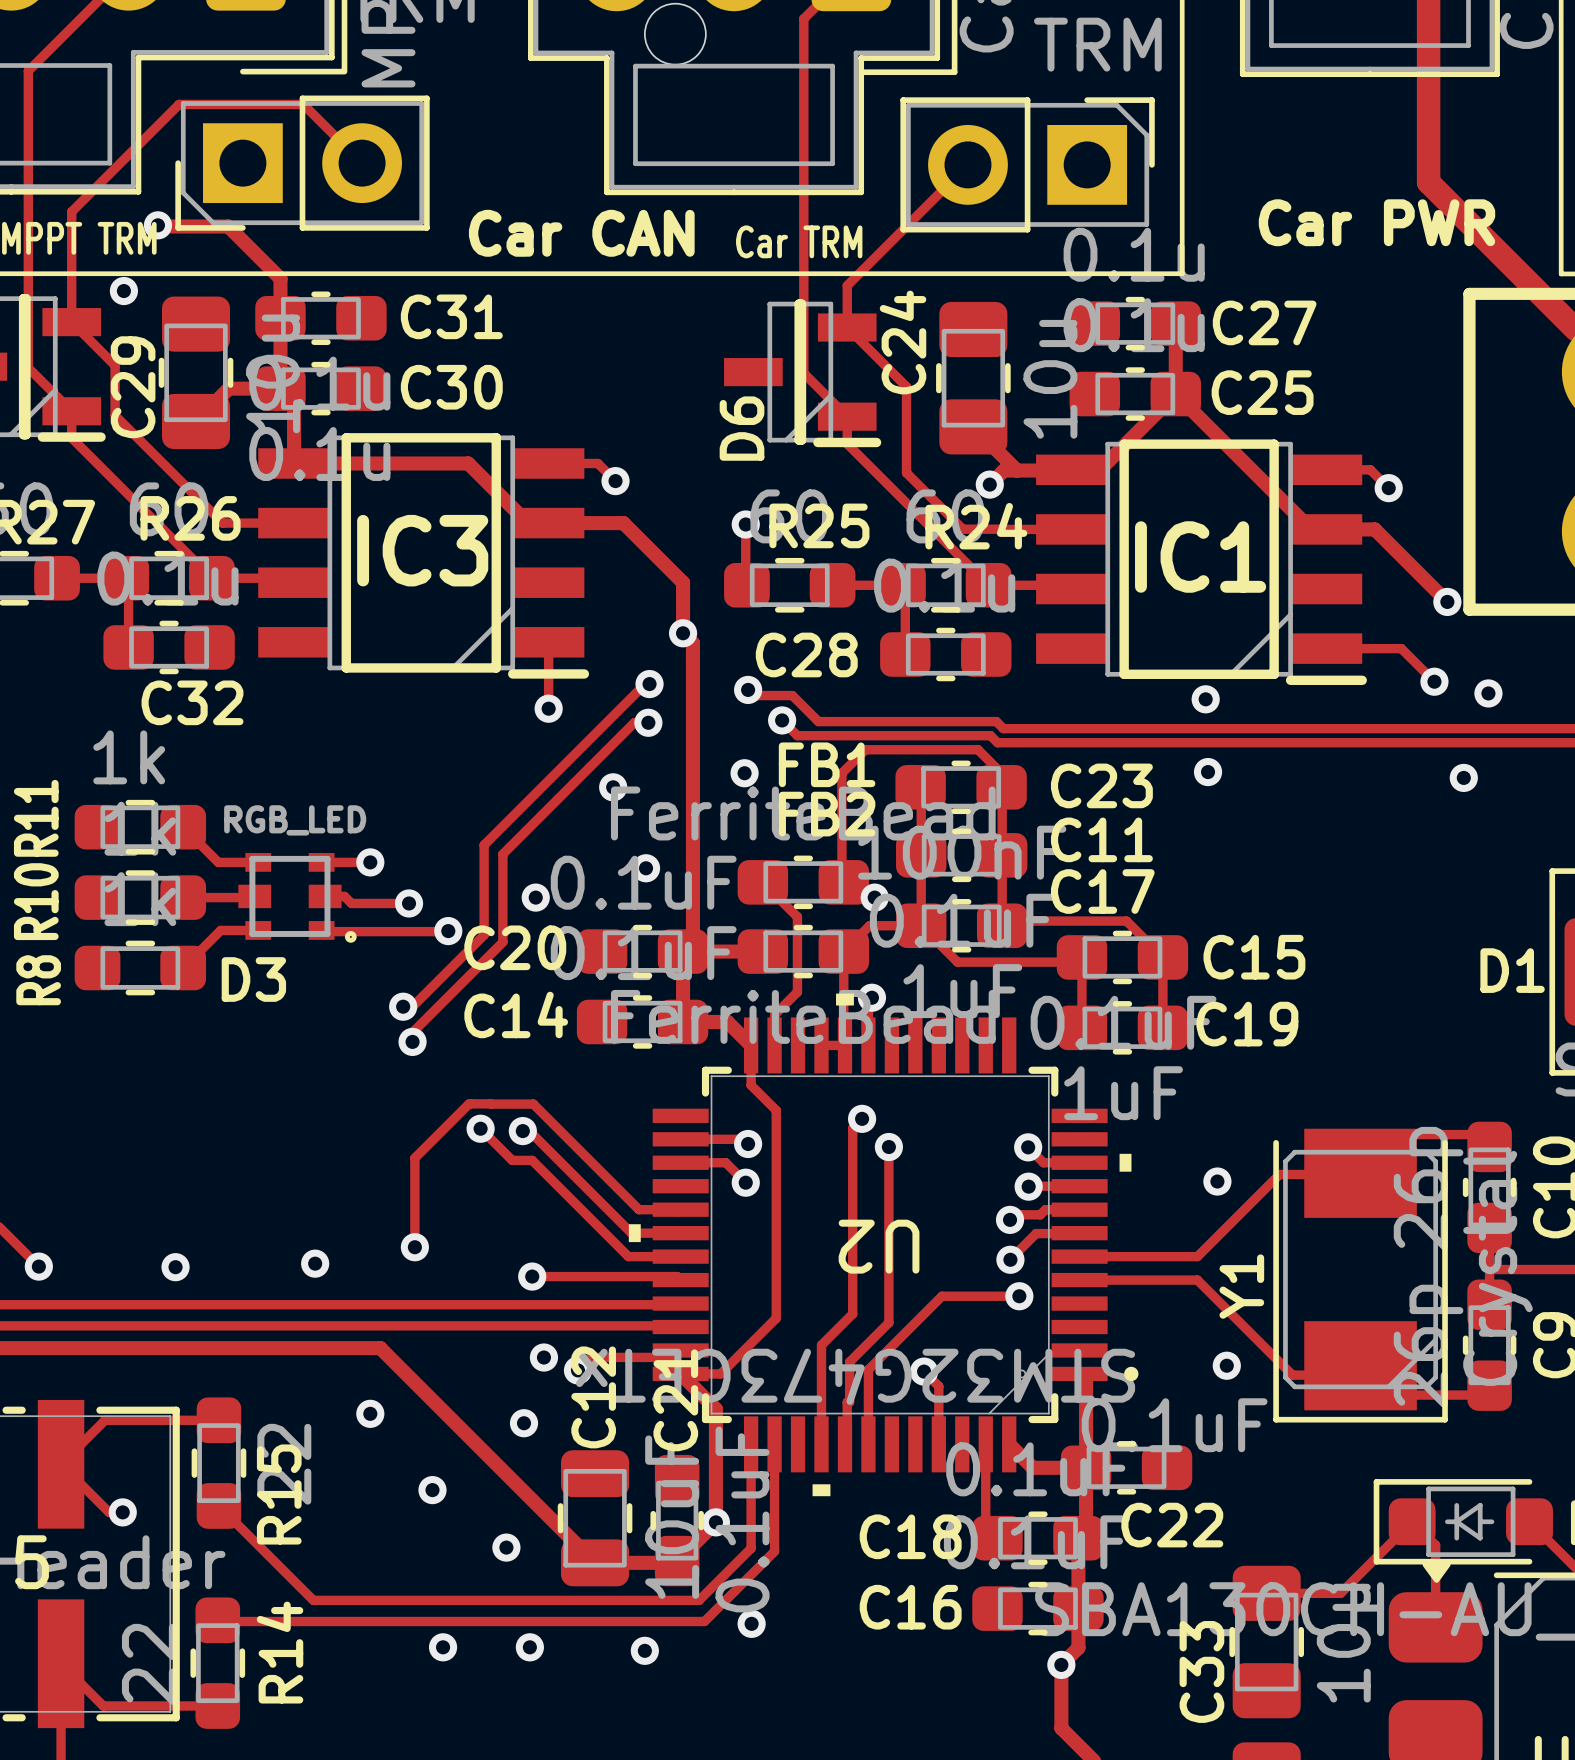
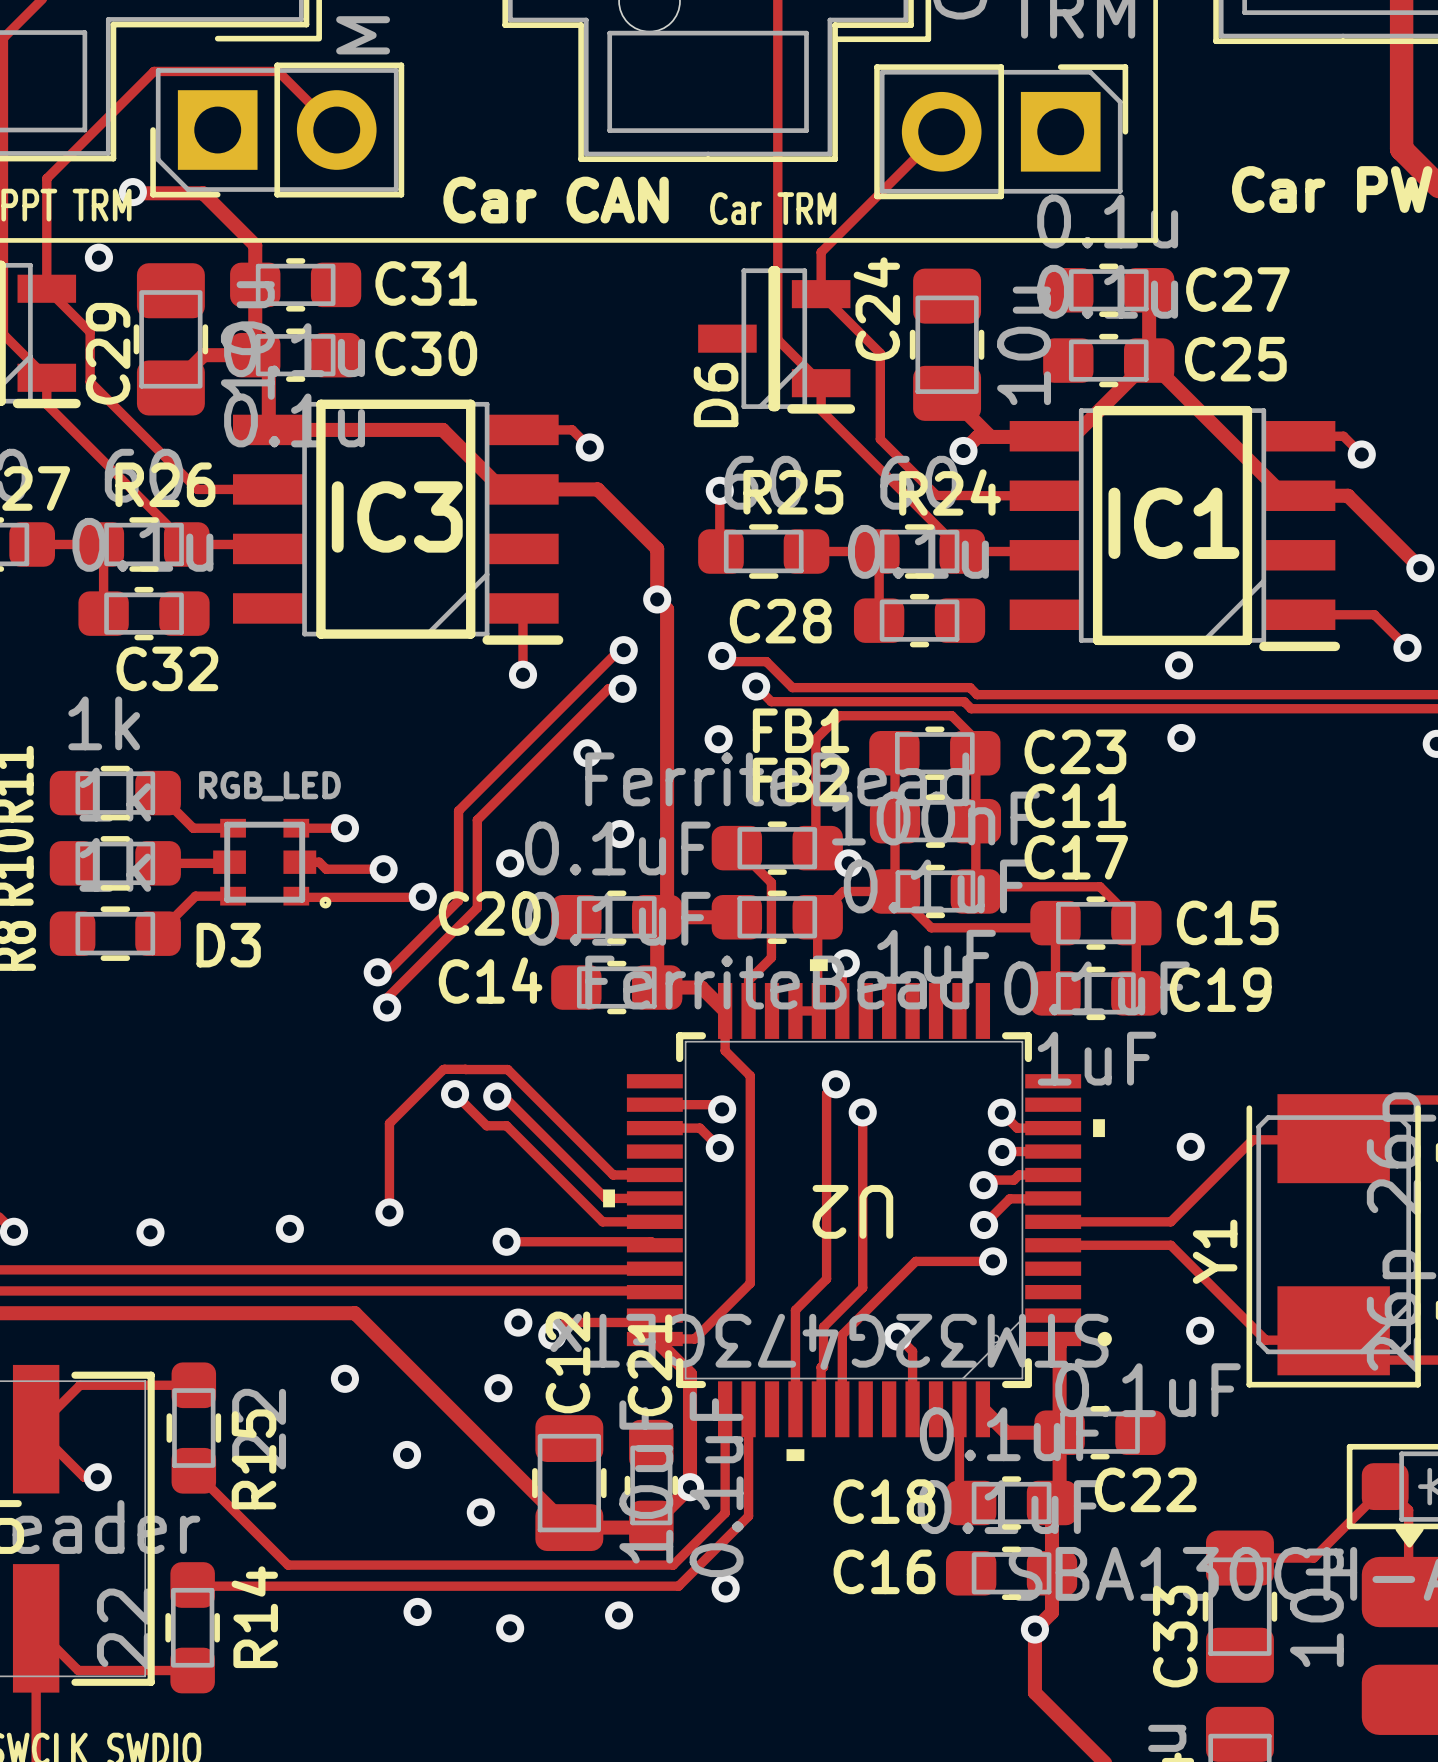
via position: (529, 1647) -> (510, 1628)

